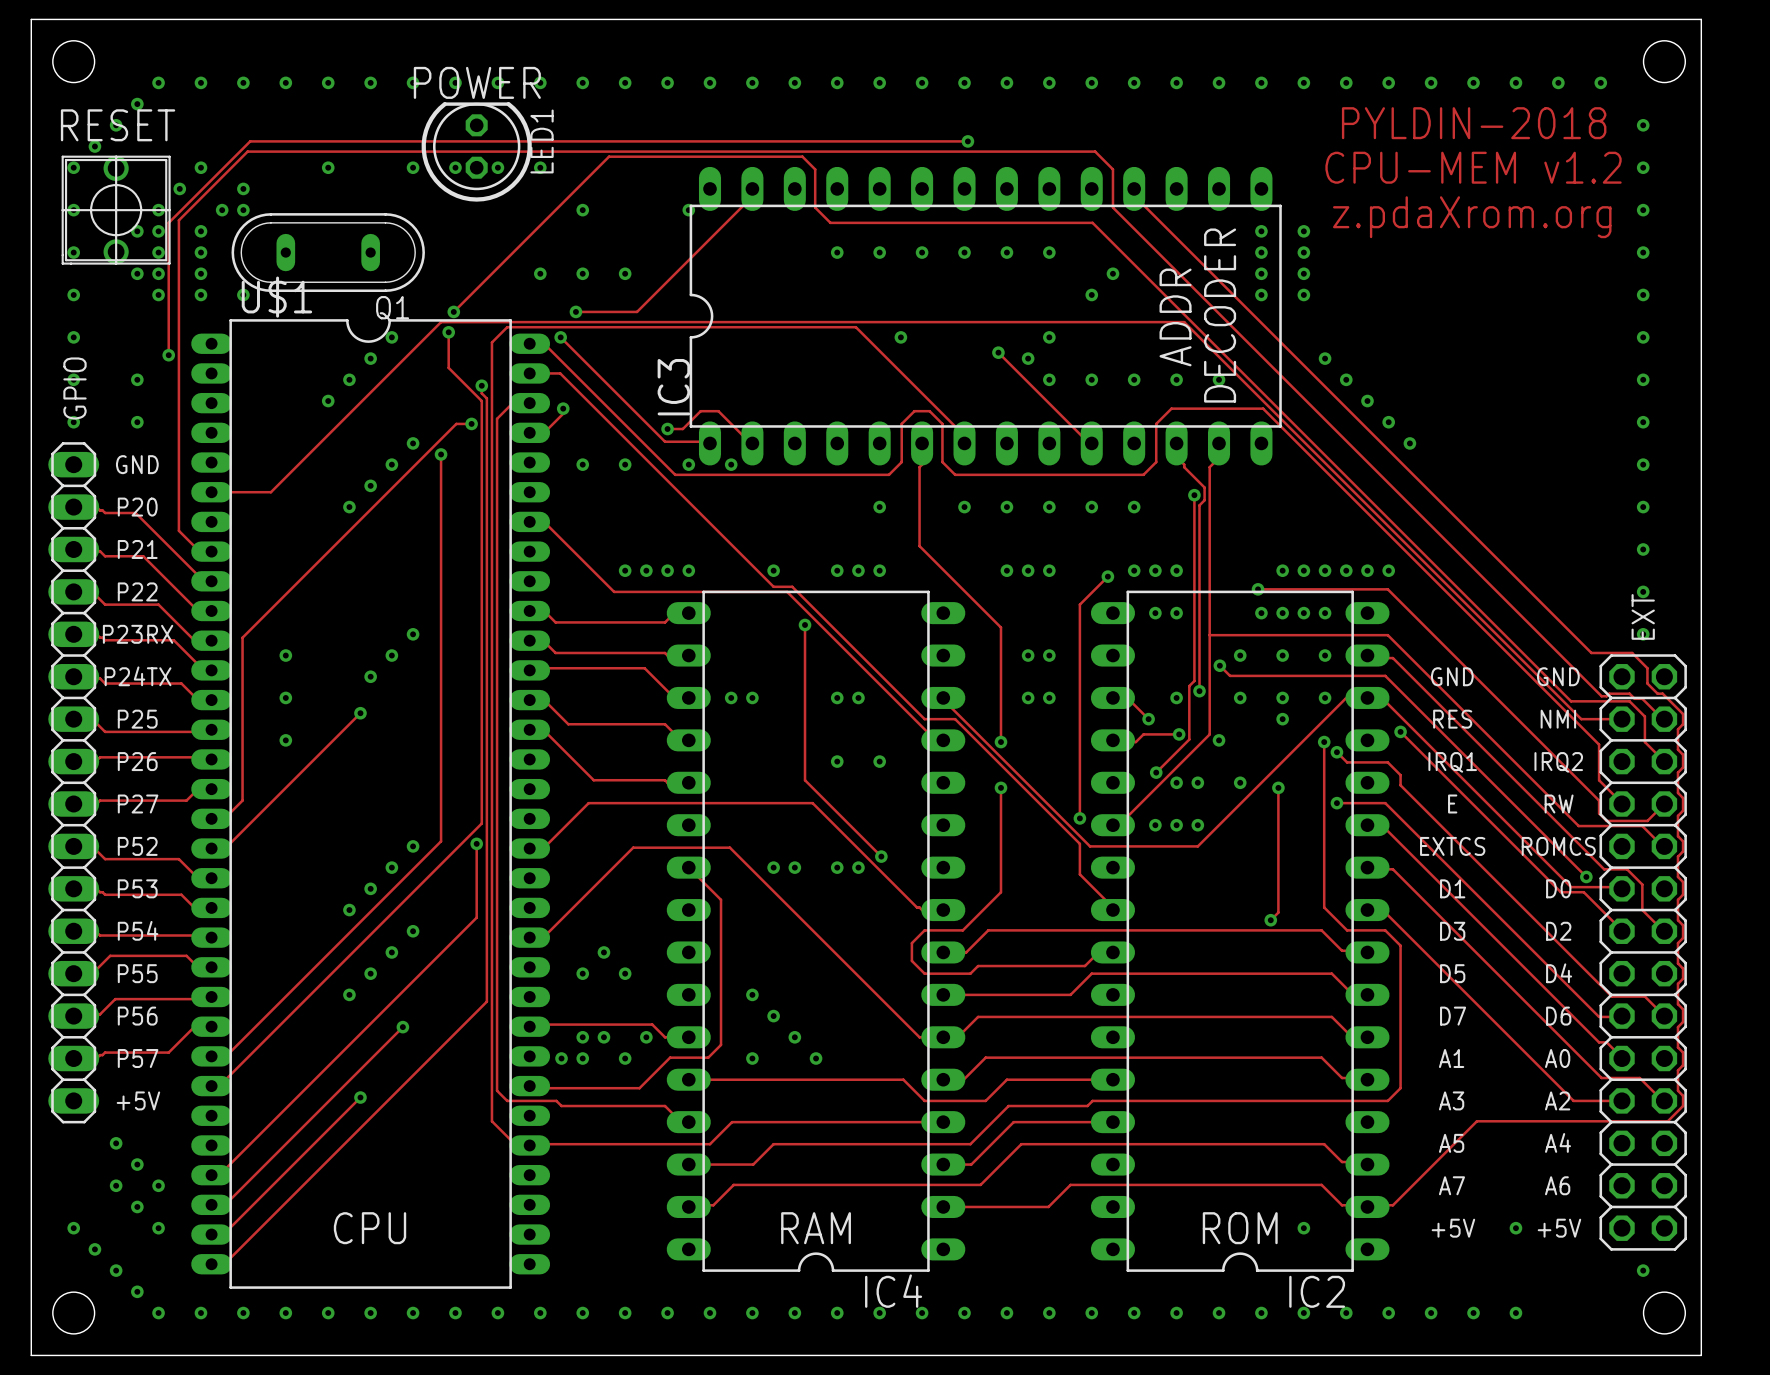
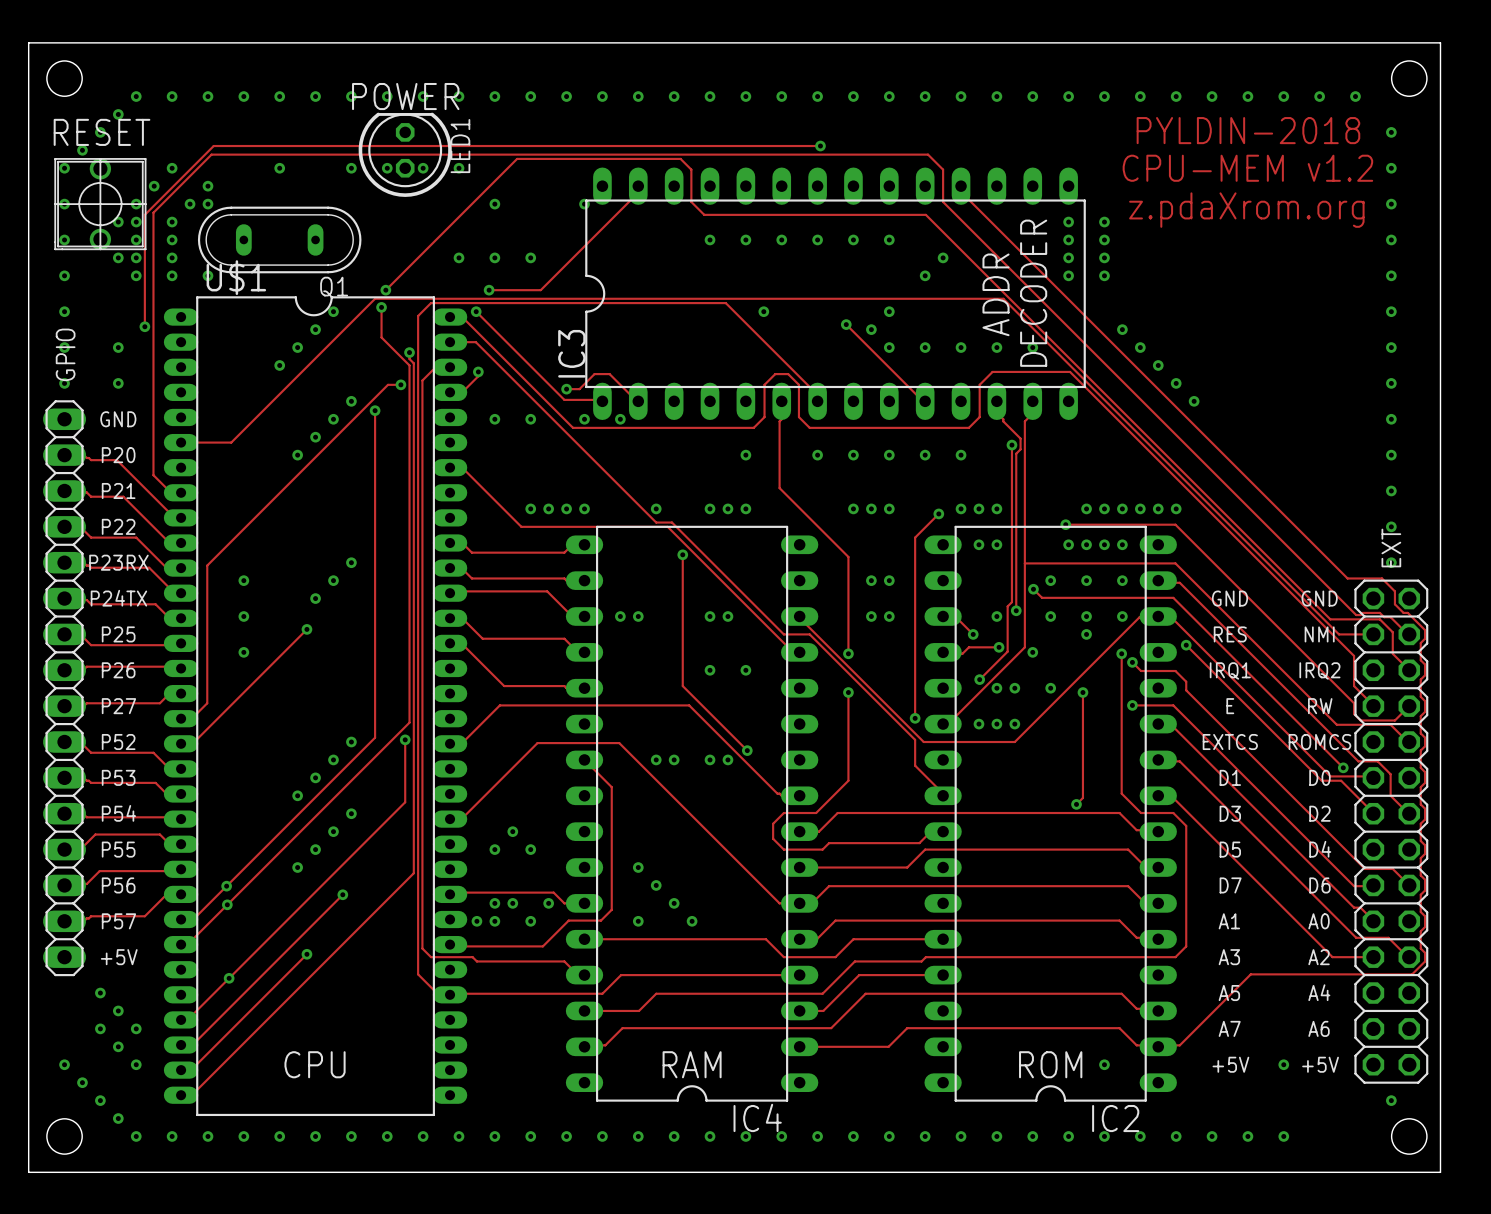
via: none -> (226, 886)
via: none -> (227, 904)
via: none -> (229, 978)

